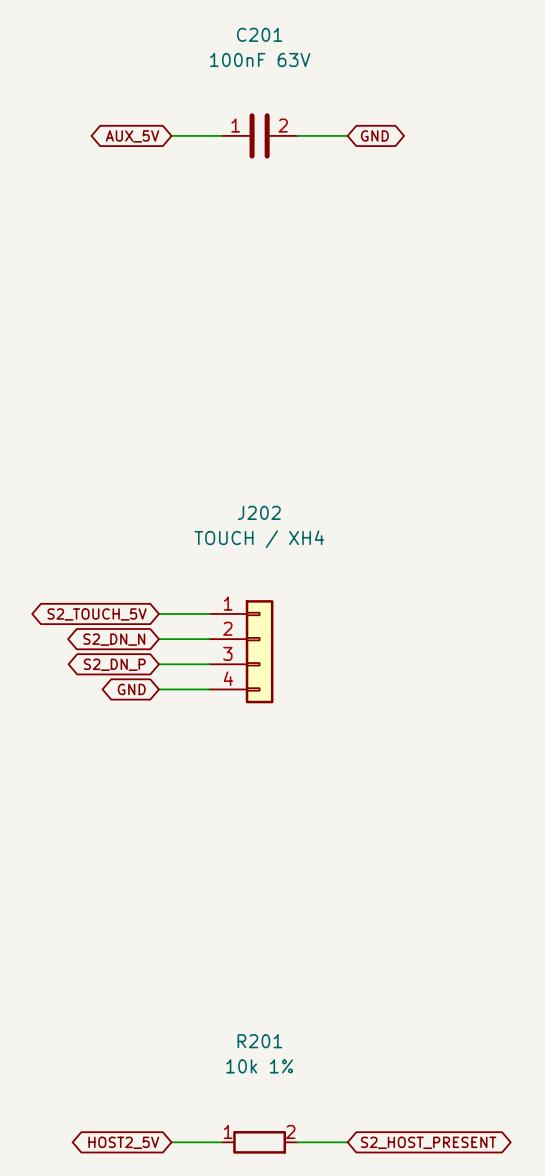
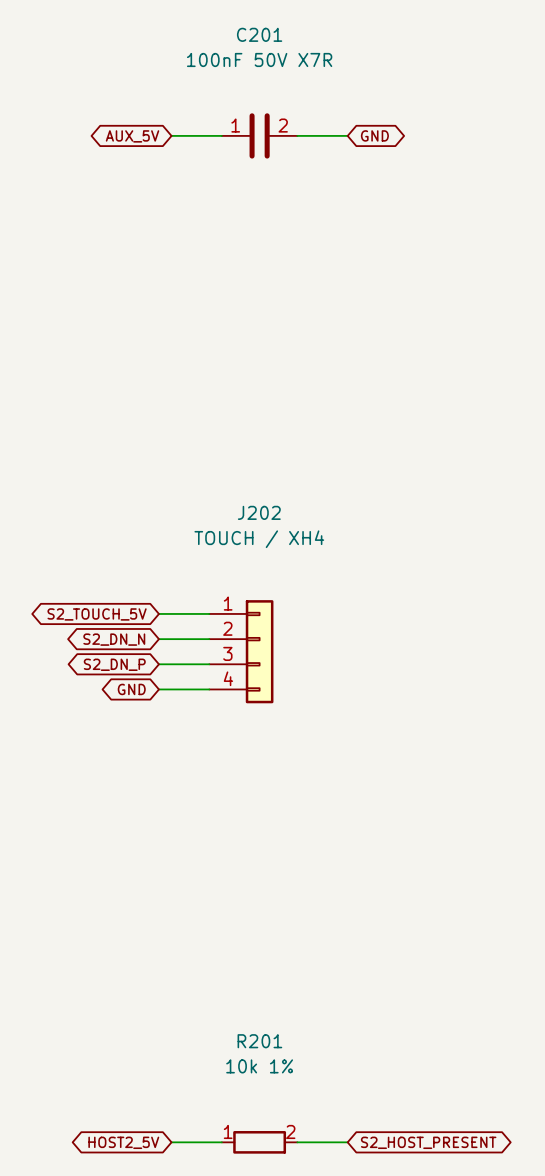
C201 value: 100nF 63V (260, 59) -> 100nF 50V X7R (259, 59)

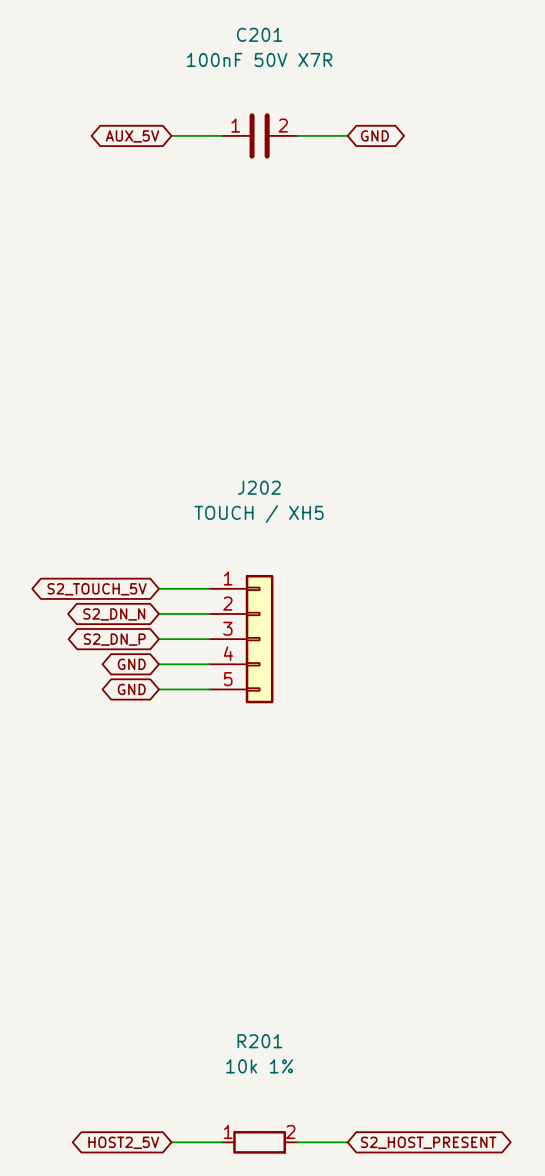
J202 value: TOUCH / XH4 (259, 539) -> TOUCH / XH5 (259, 514)
wire: none -> (158, 588) (209, 588)
global label: none -> S2_TOUCH_5V (97, 589)
J202 symbol: [209, 600, 274, 704] -> [209, 574, 274, 704]
global label: S2_TOUCH_5V (97, 614) -> S2_DN_N (114, 614)
global label: S2_DN_N (114, 639) -> S2_DN_P (114, 639)
global label: S2_DN_P (114, 664) -> GND (131, 664)

